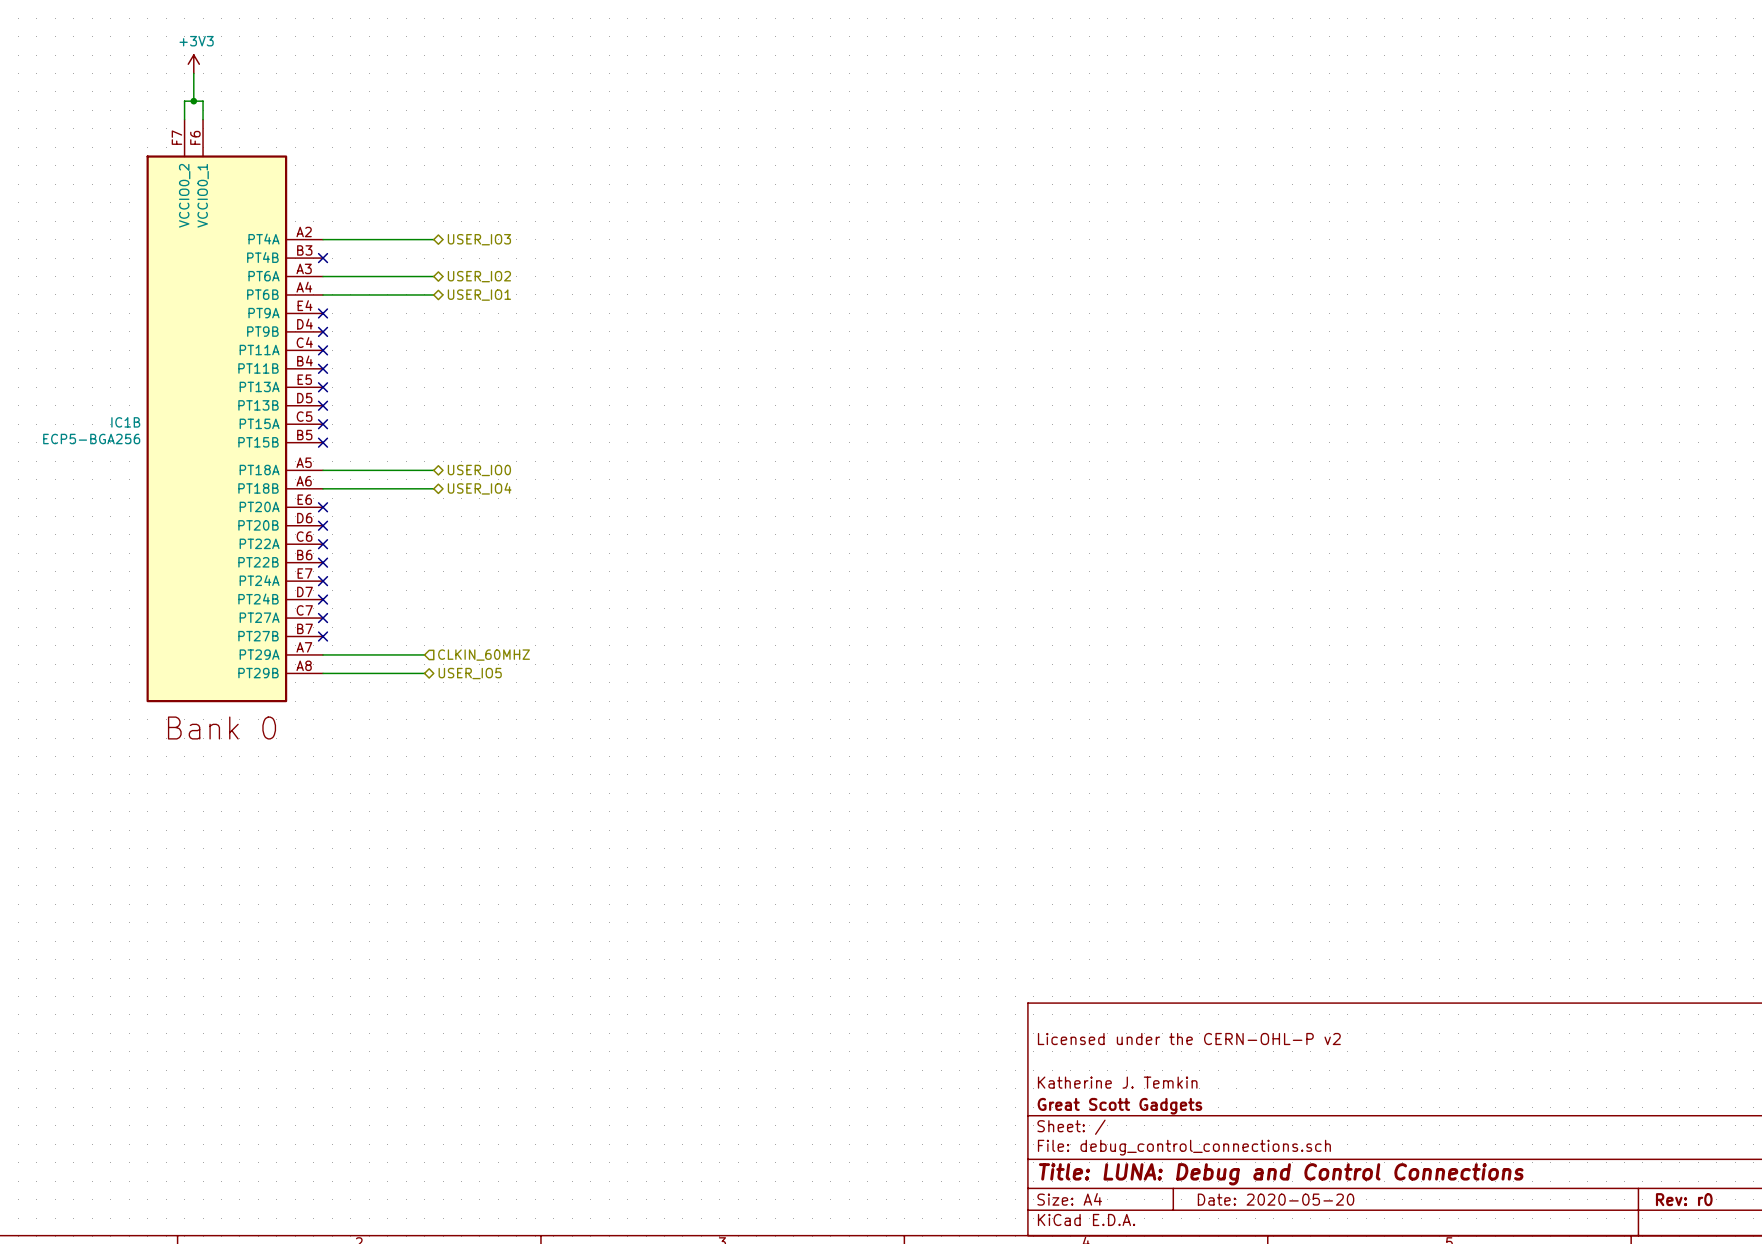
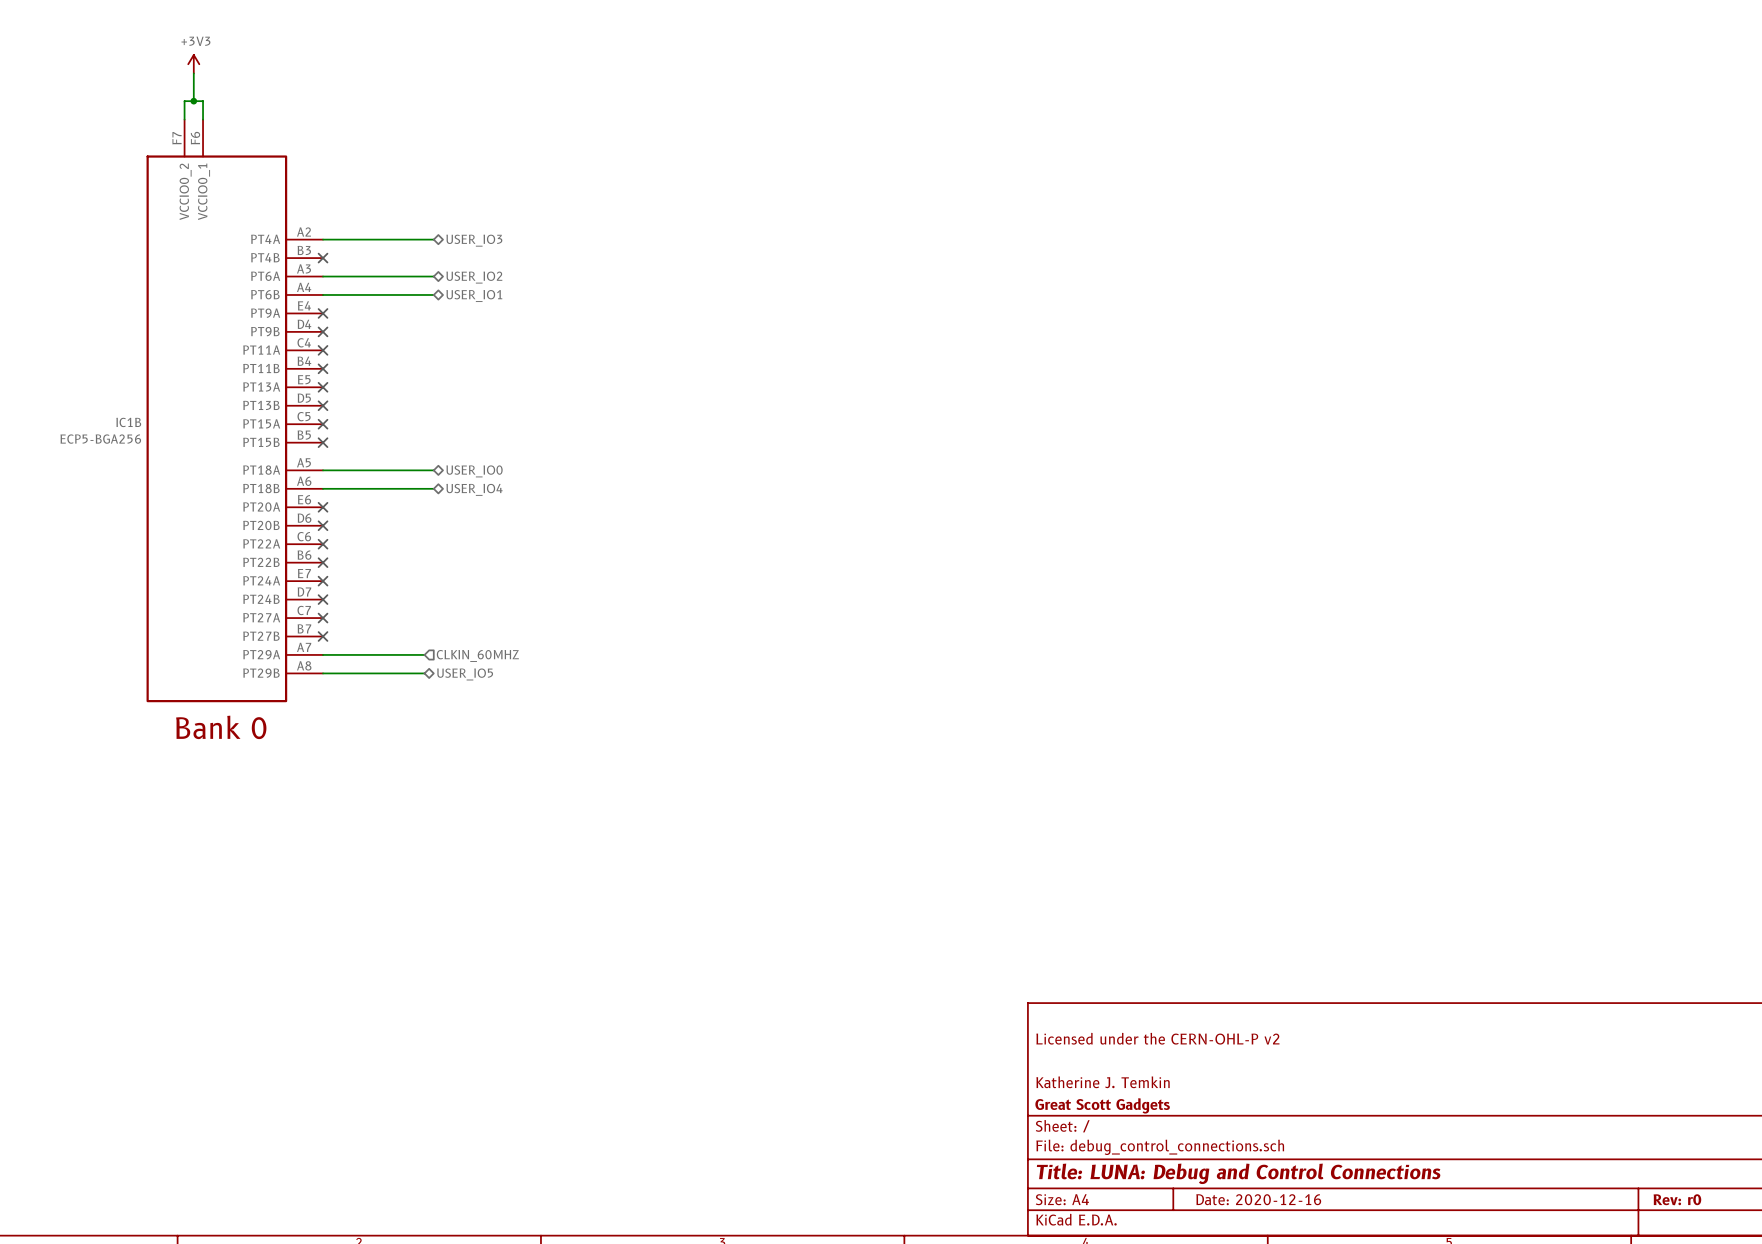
title block: Date: 2020-05-20 (1276, 1199) -> Date: 2020-12-16 (1258, 1199)

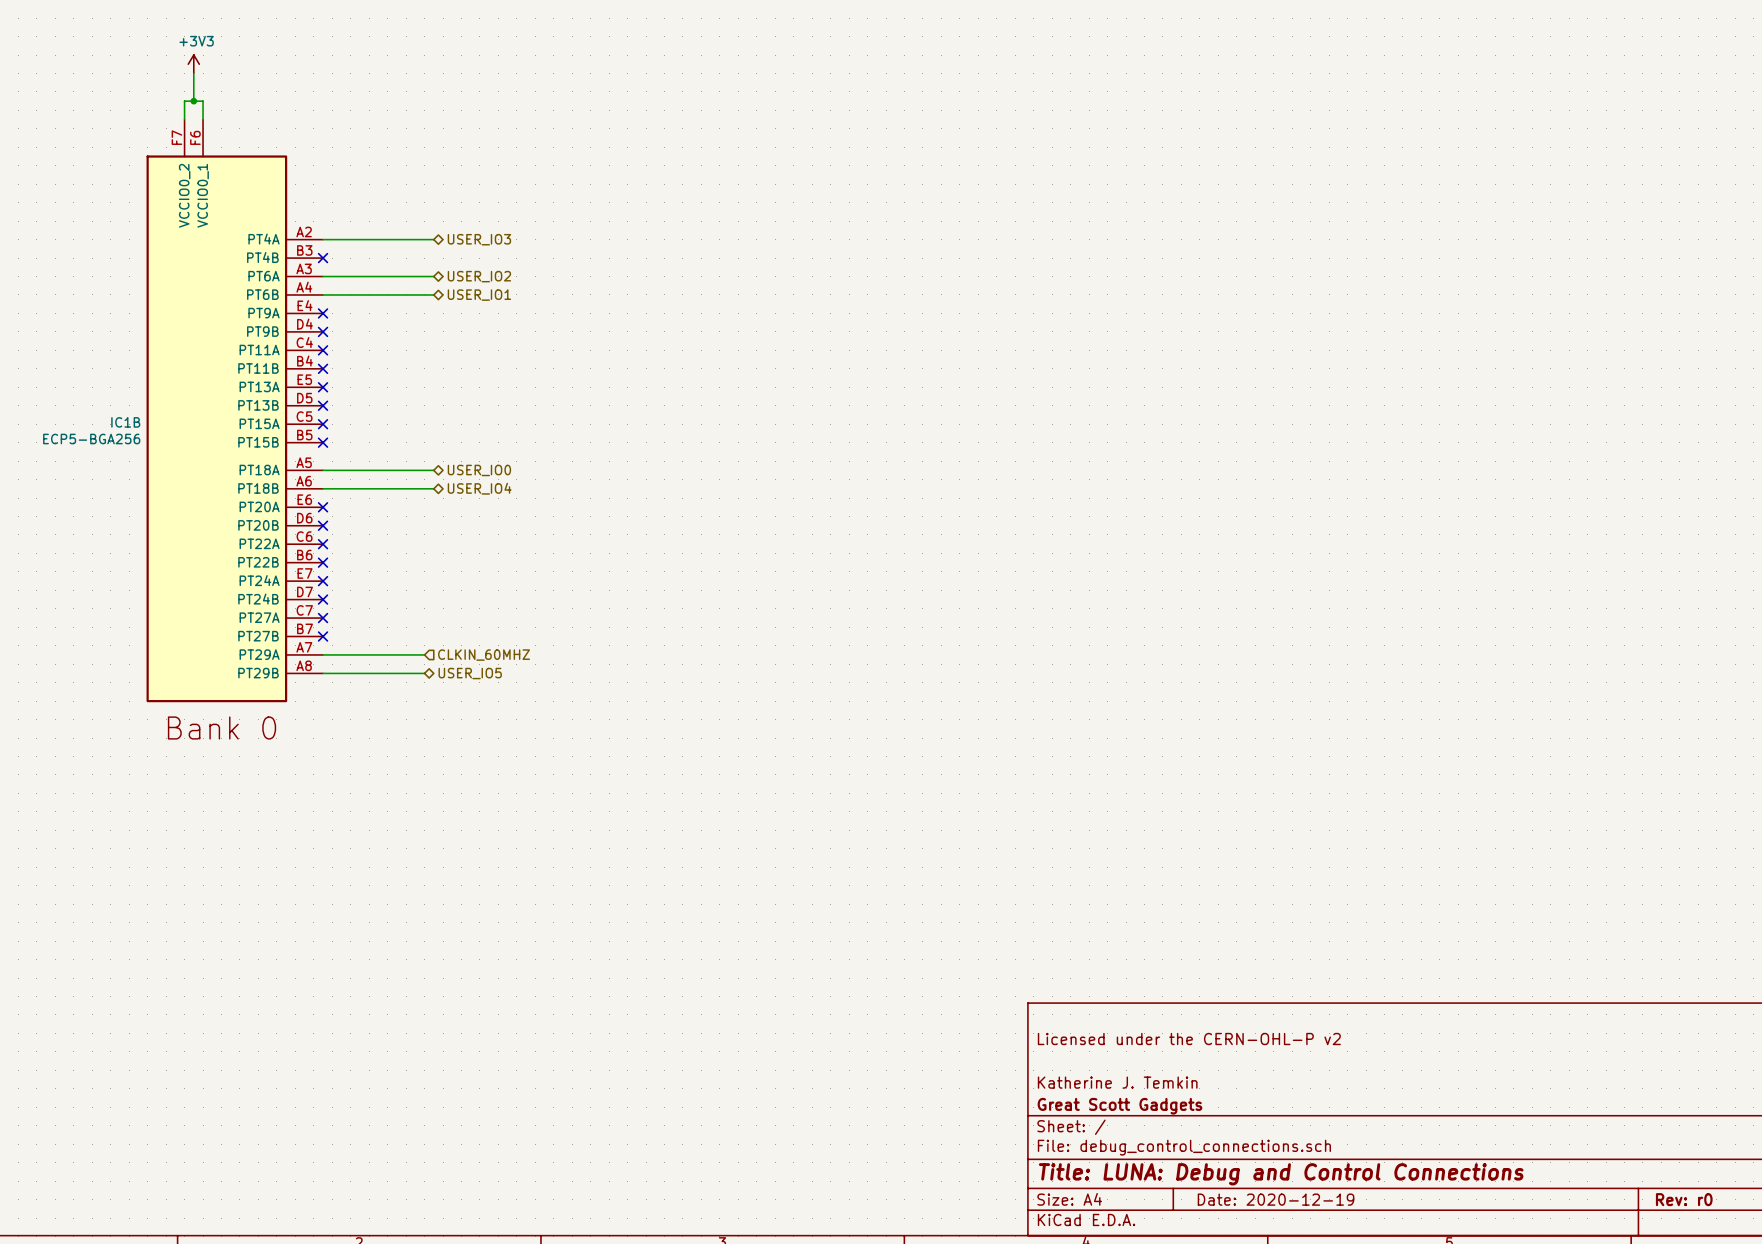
title block: Date: 2020-12-16 (1258, 1199) -> Date: 2020-12-19 (1276, 1199)

